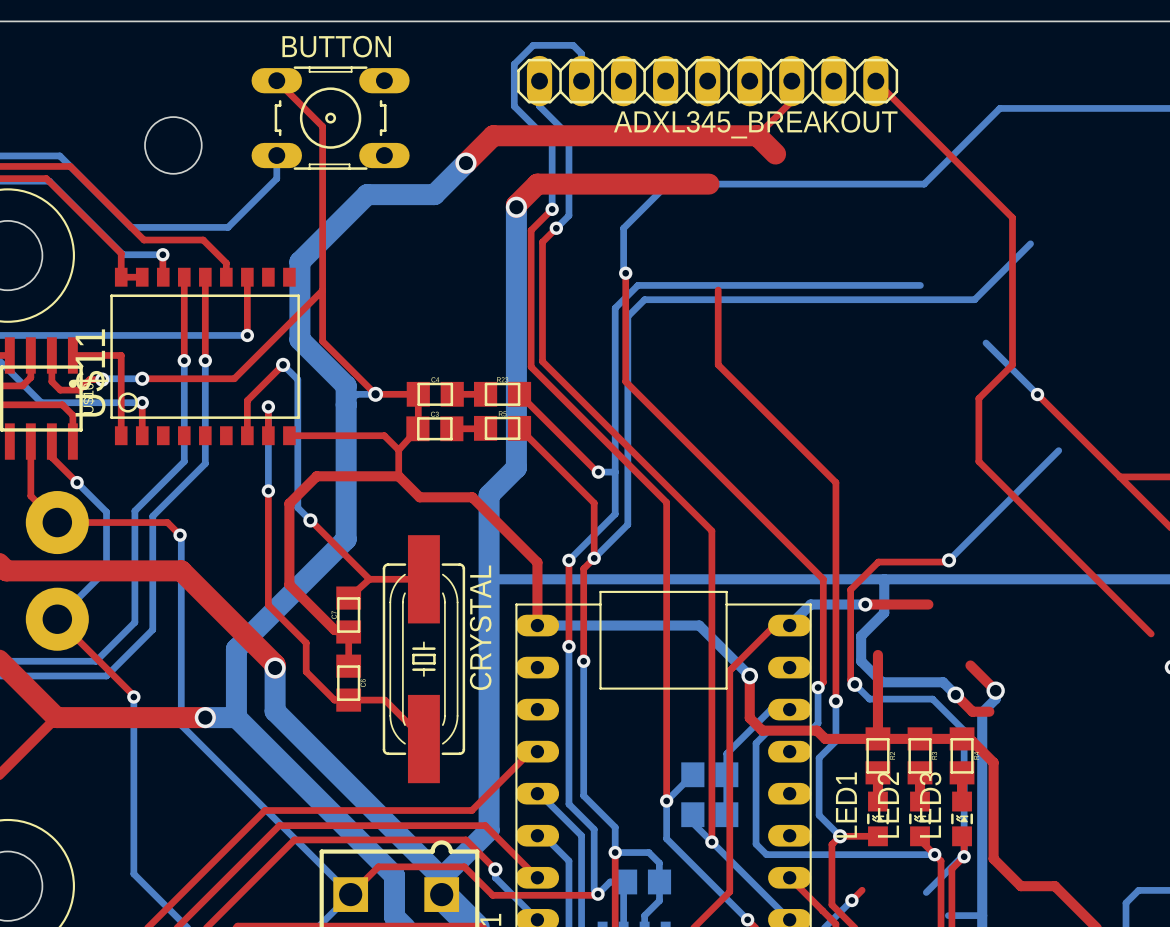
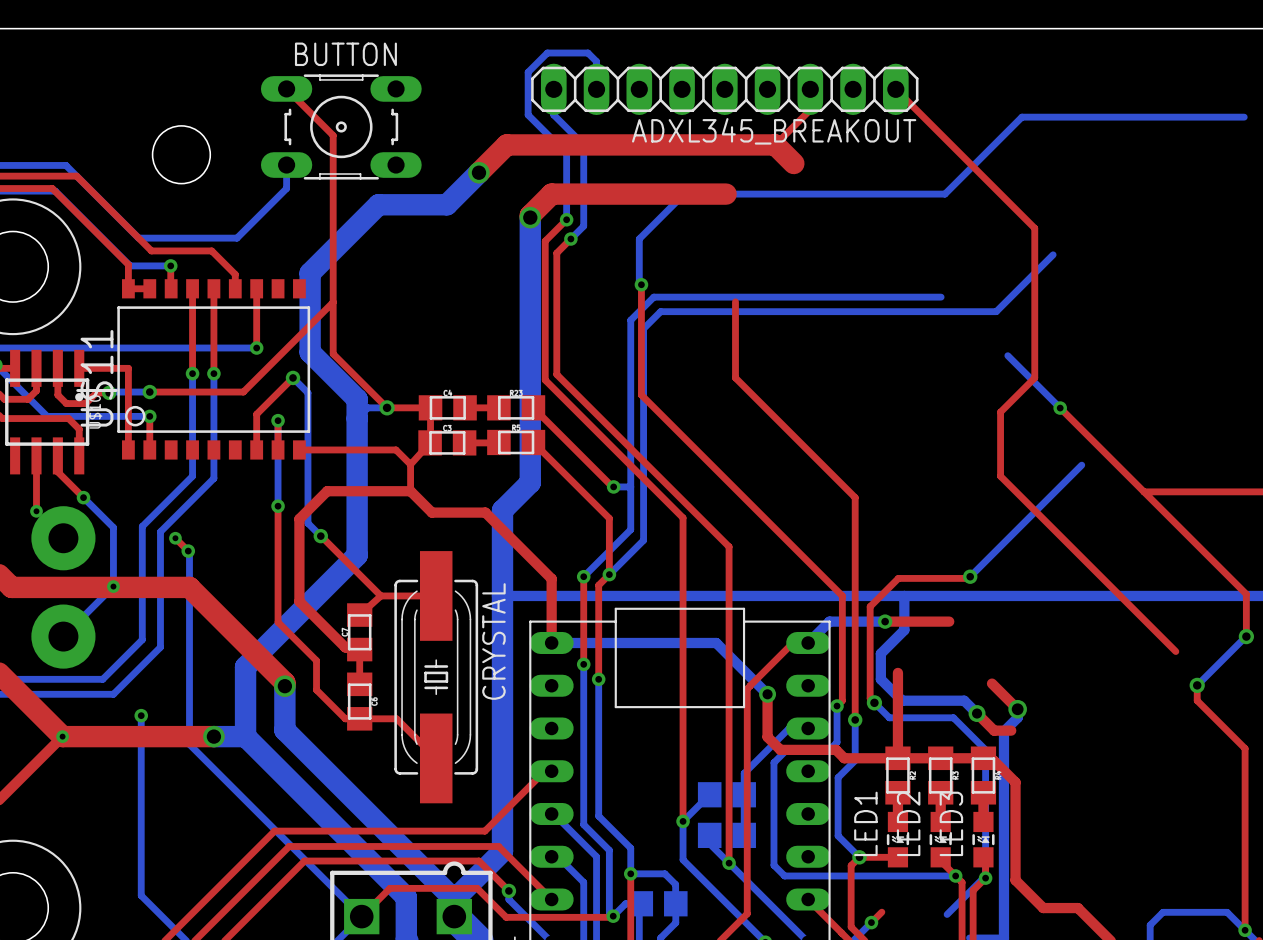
top track: (30, 496) (57, 522) (167, 522) -> none
via: none -> (36, 511)
via: none -> (175, 538)
via: none -> (113, 586)
top track: (57, 619) (133, 695) -> none
via: none -> (62, 736)

